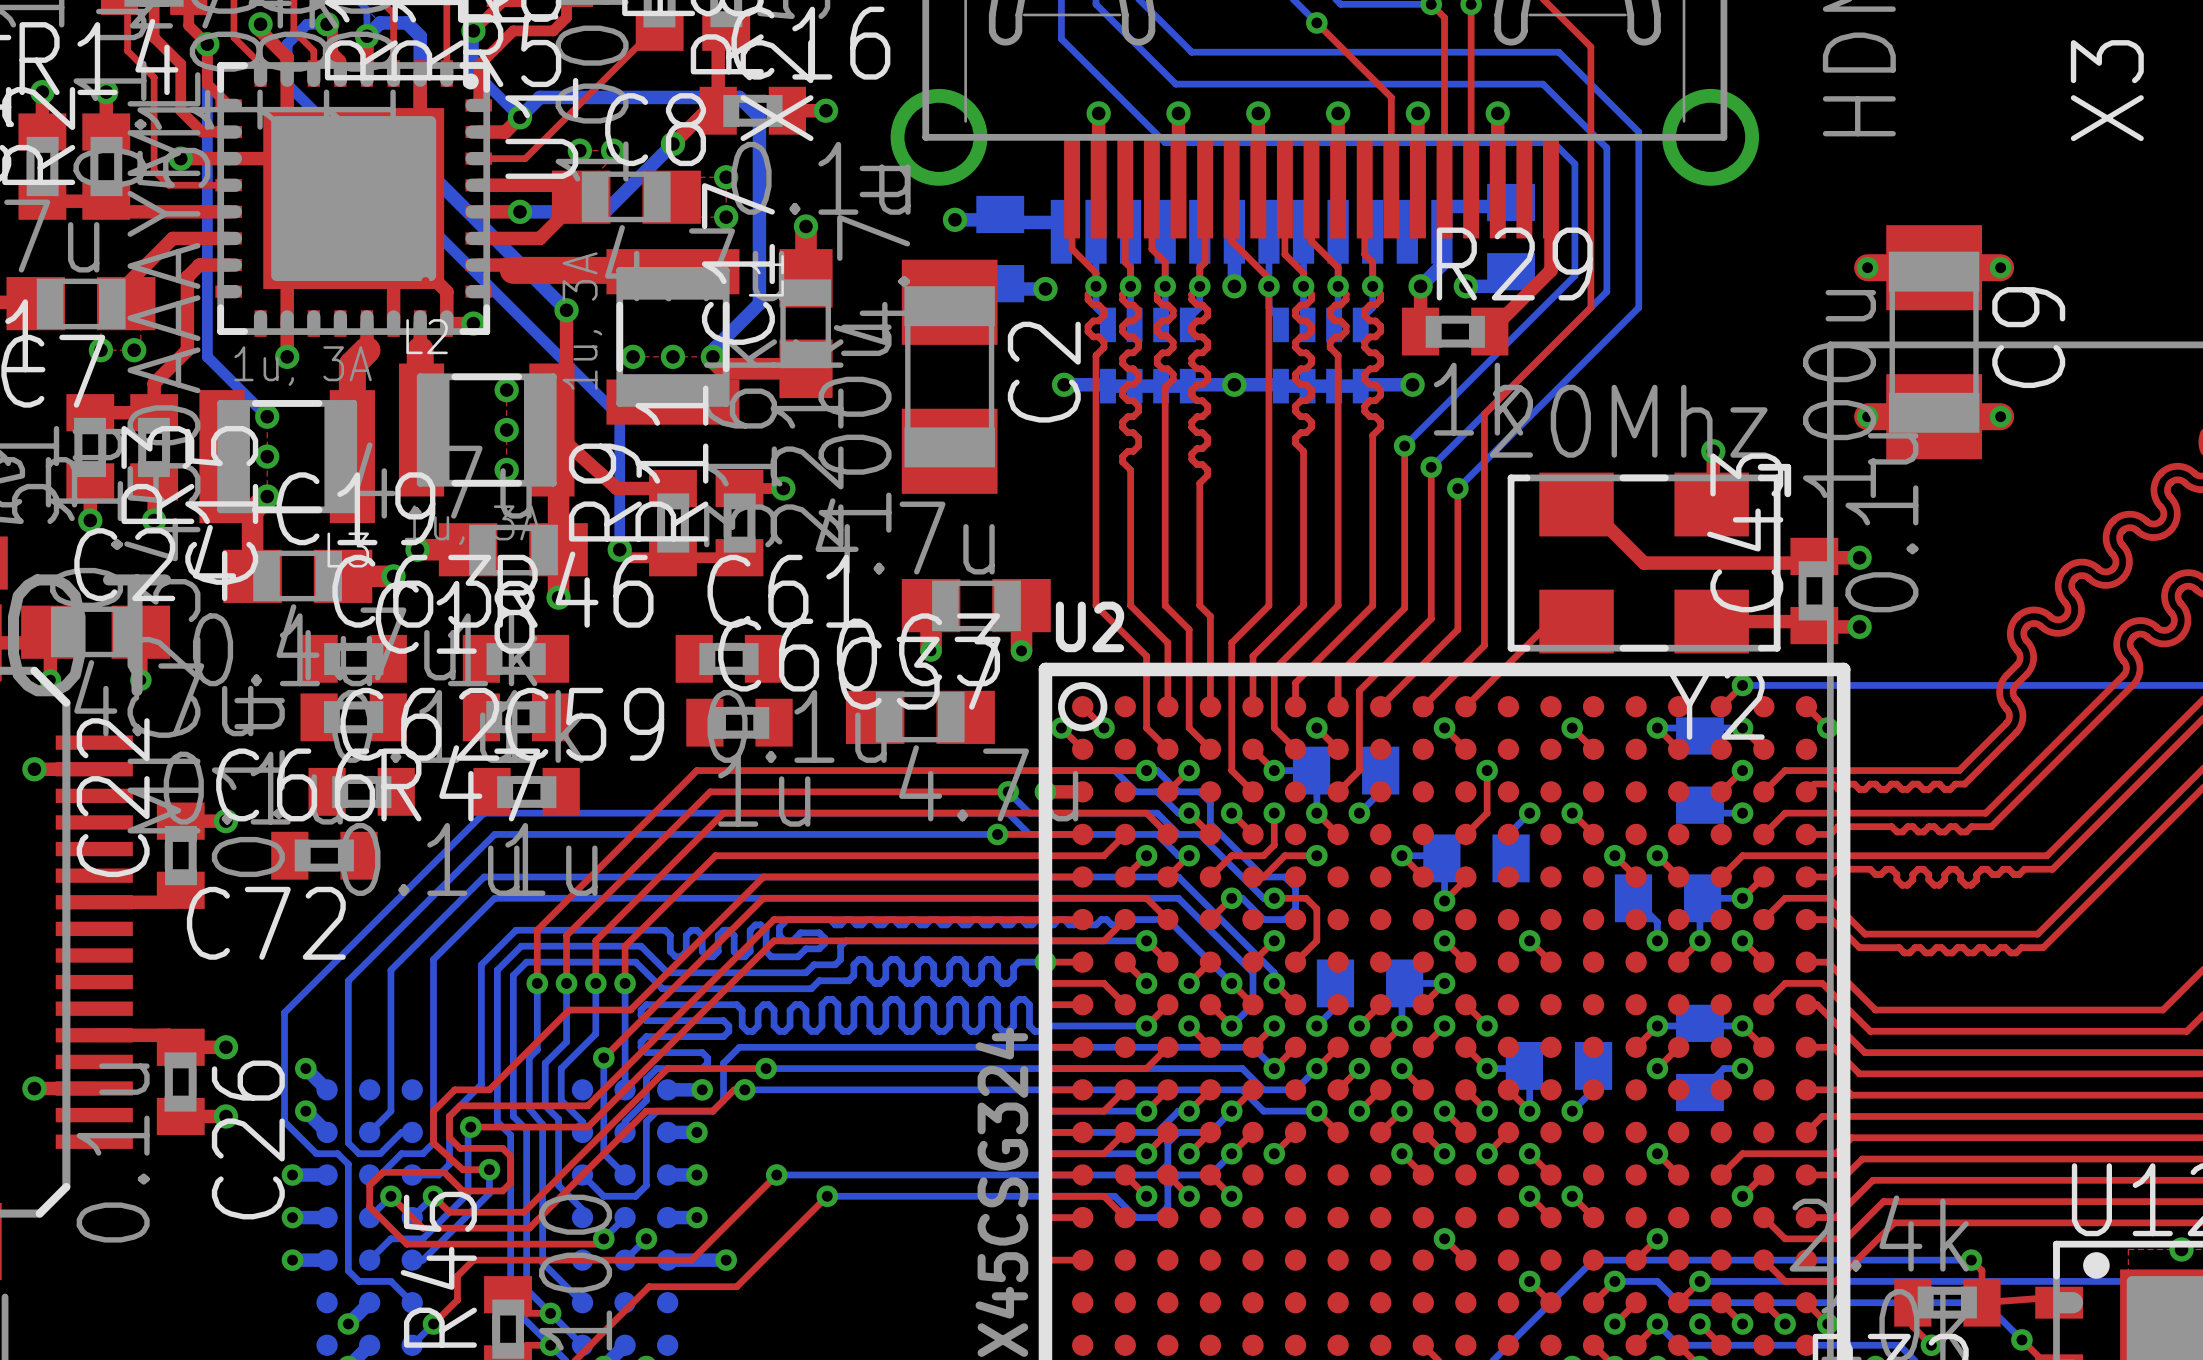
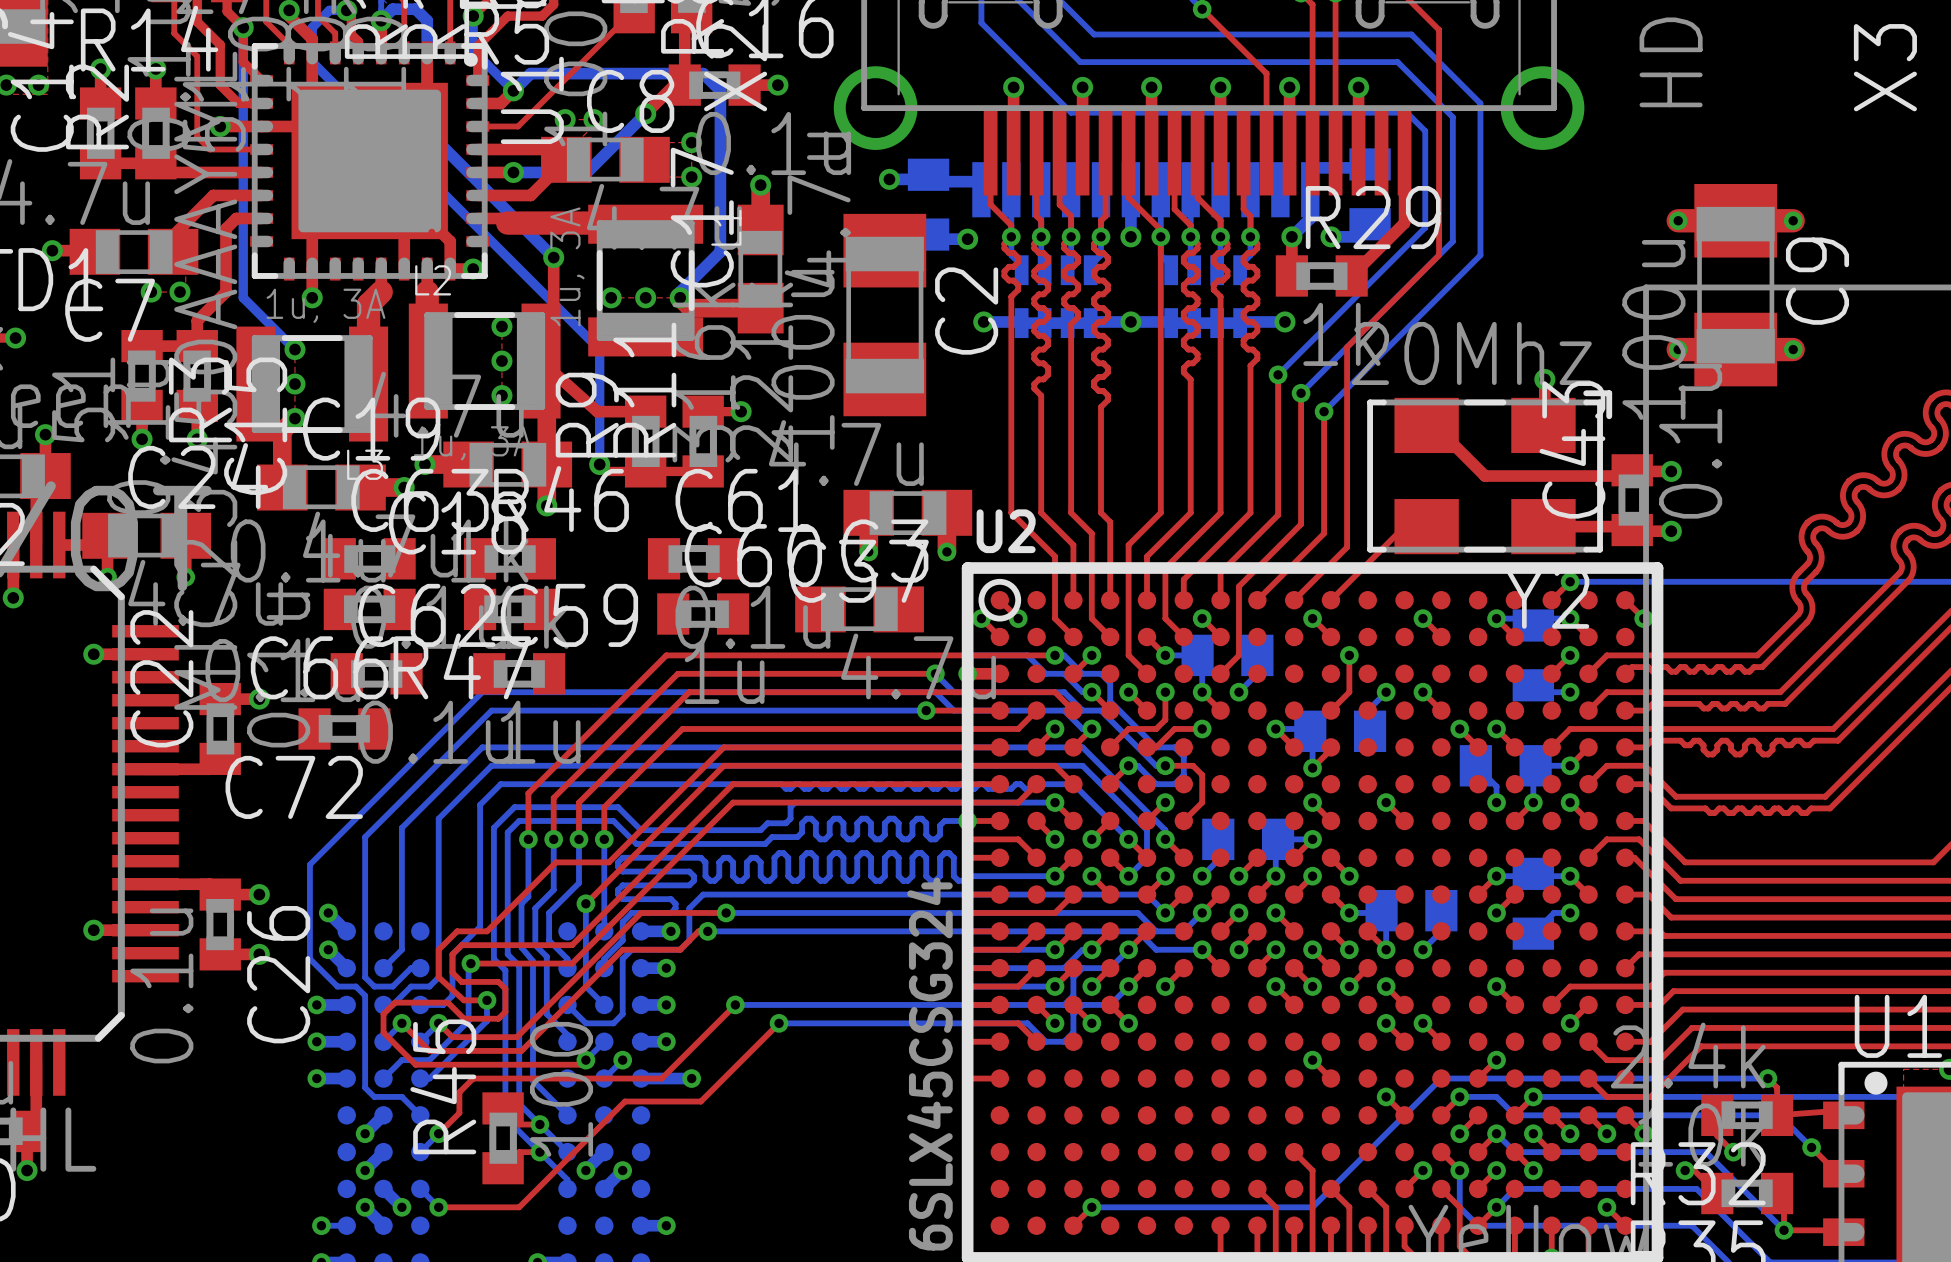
bottom track: (787, 919) (779, 927) (779, 935) (784, 940) (792, 940) (800, 932) (819, 932) (824, 938) (824, 943) (819, 948) (806, 948) (798, 956) (771, 956) (766, 951) (766, 930) (760, 924) (755, 924) (750, 930) (750, 951) (744, 956) (739, 956) (734, 951) (734, 935) (728, 930) (723, 930) (718, 935) (718, 951) (712, 956) (707, 956) (702, 951) (702, 935) (696, 930) (691, 930) (686, 935) (686, 951) (680, 956) (675, 956) (670, 951) (670, 935) (664, 930) (515, 930) (481, 964) -> (744, 784) (500, 784) (480, 804) (480, 823)

